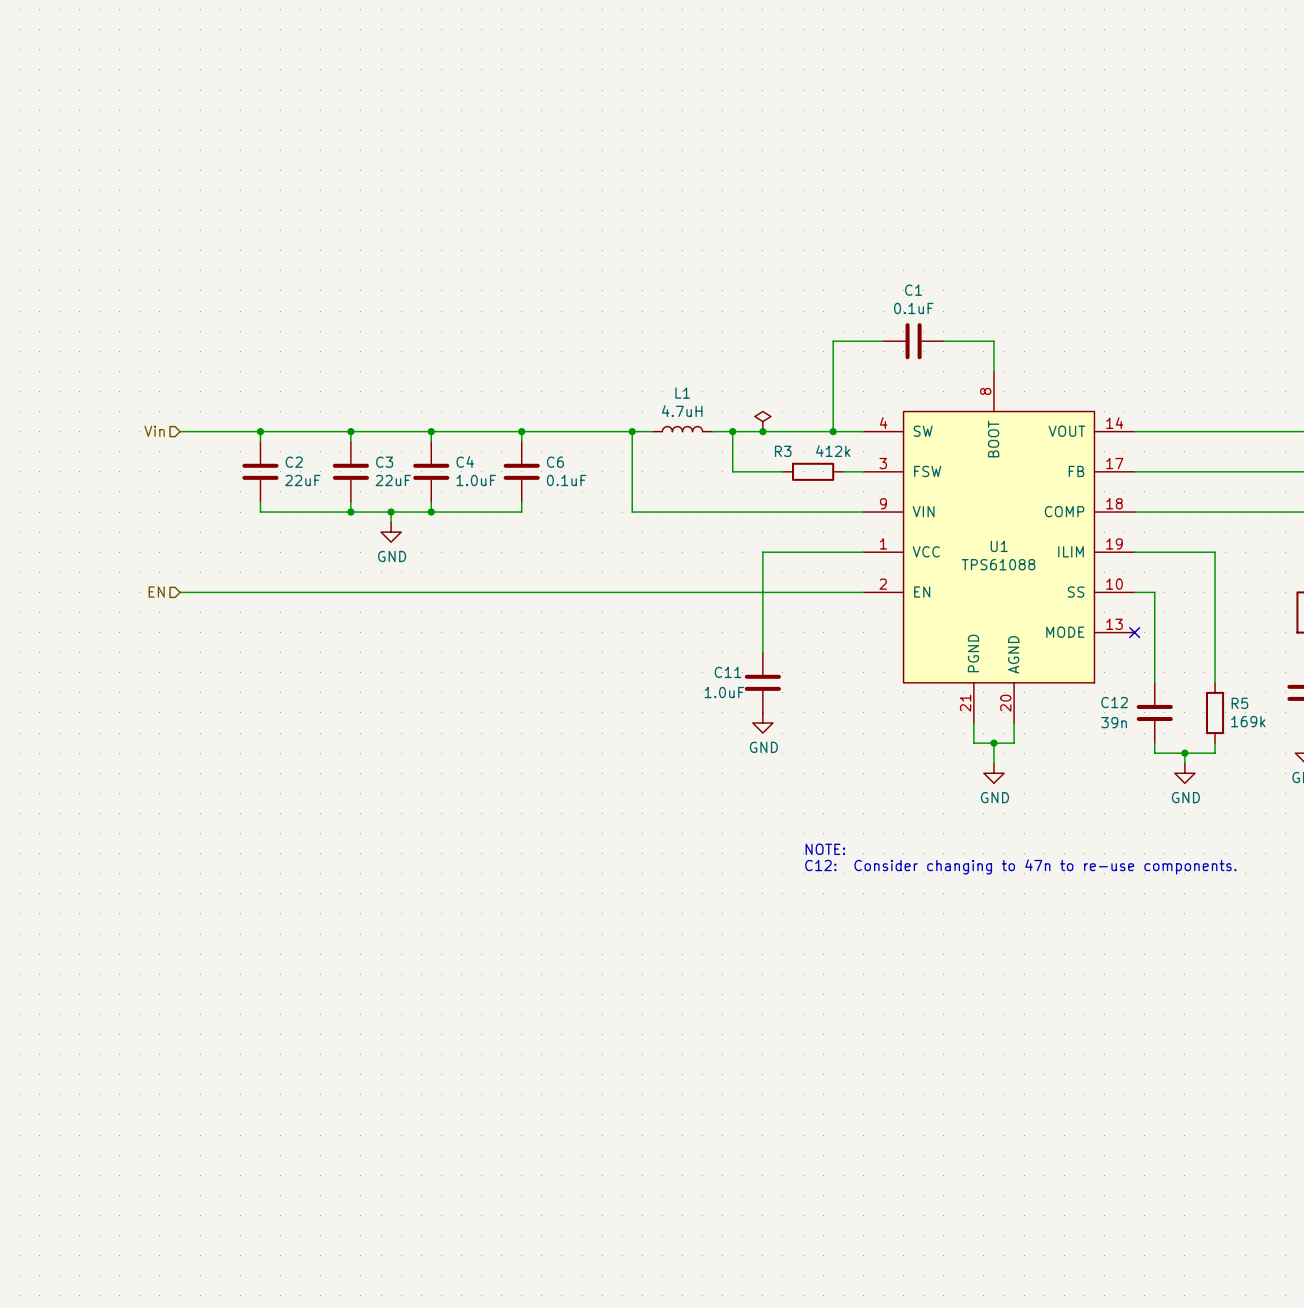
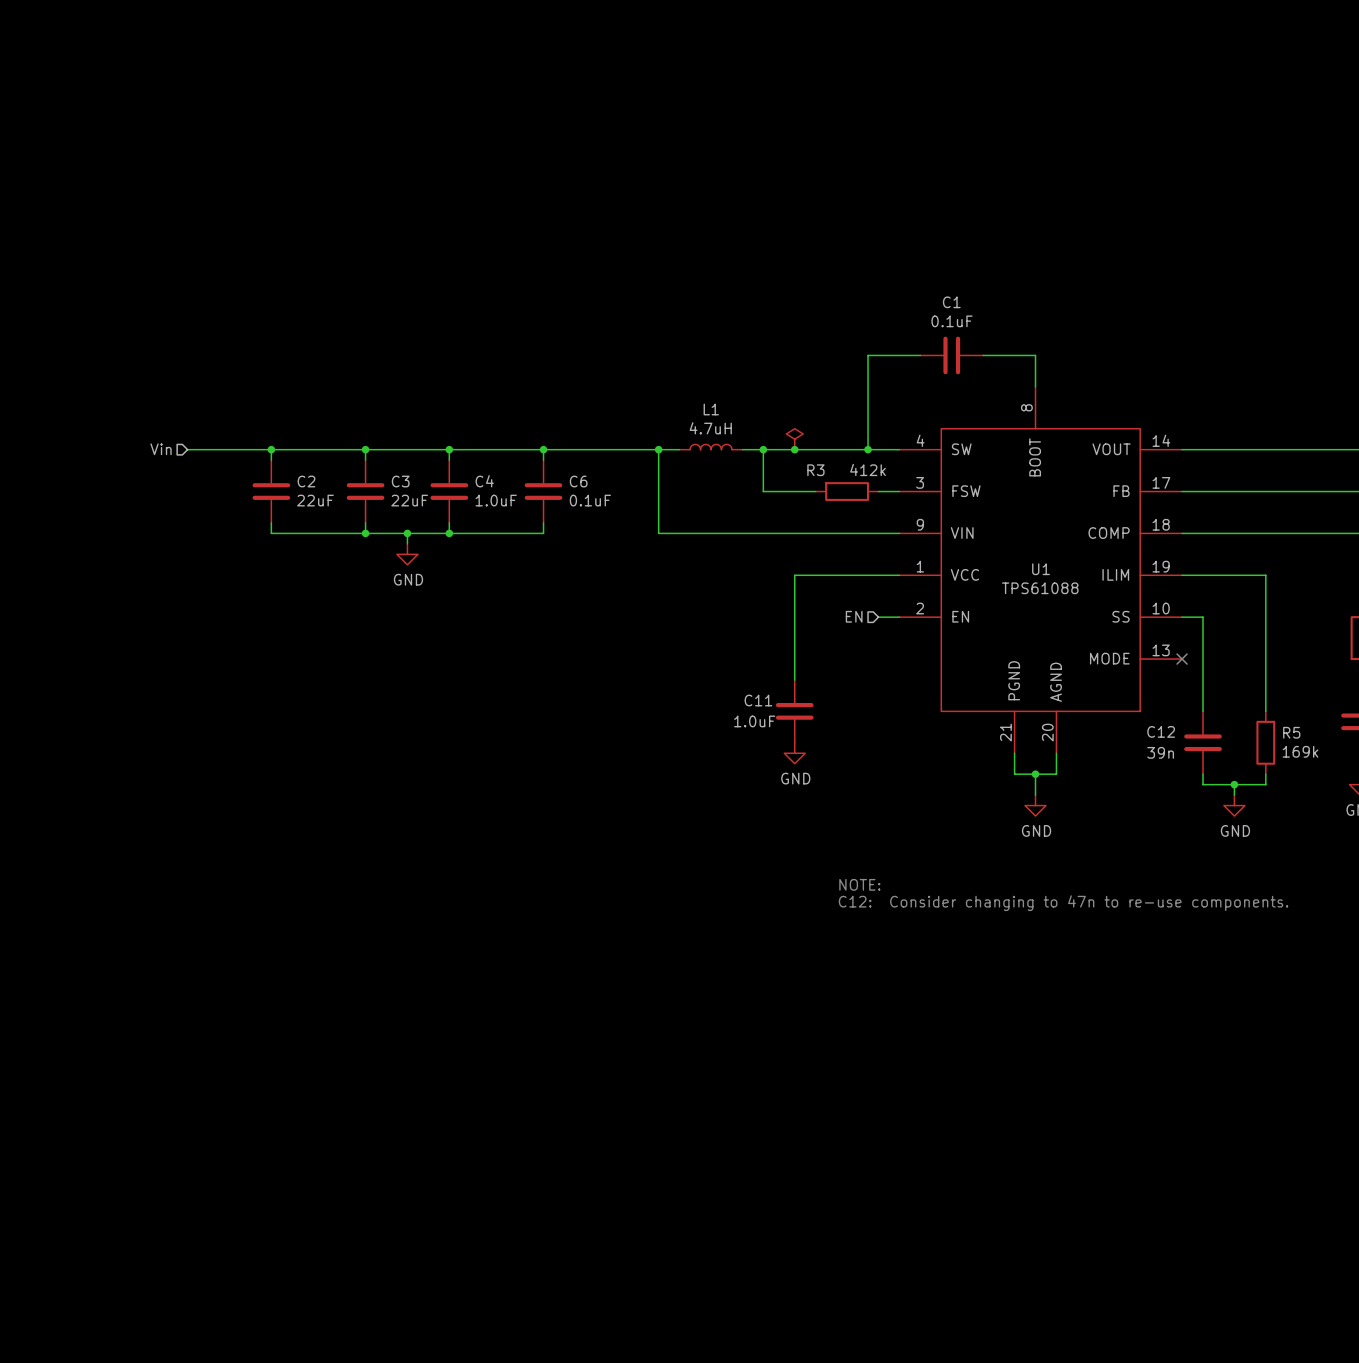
hierarchical label: EN (156, 592) -> none
wire: (180, 592) (843, 592) -> none
hierarchical label: none -> EN (854, 616)

